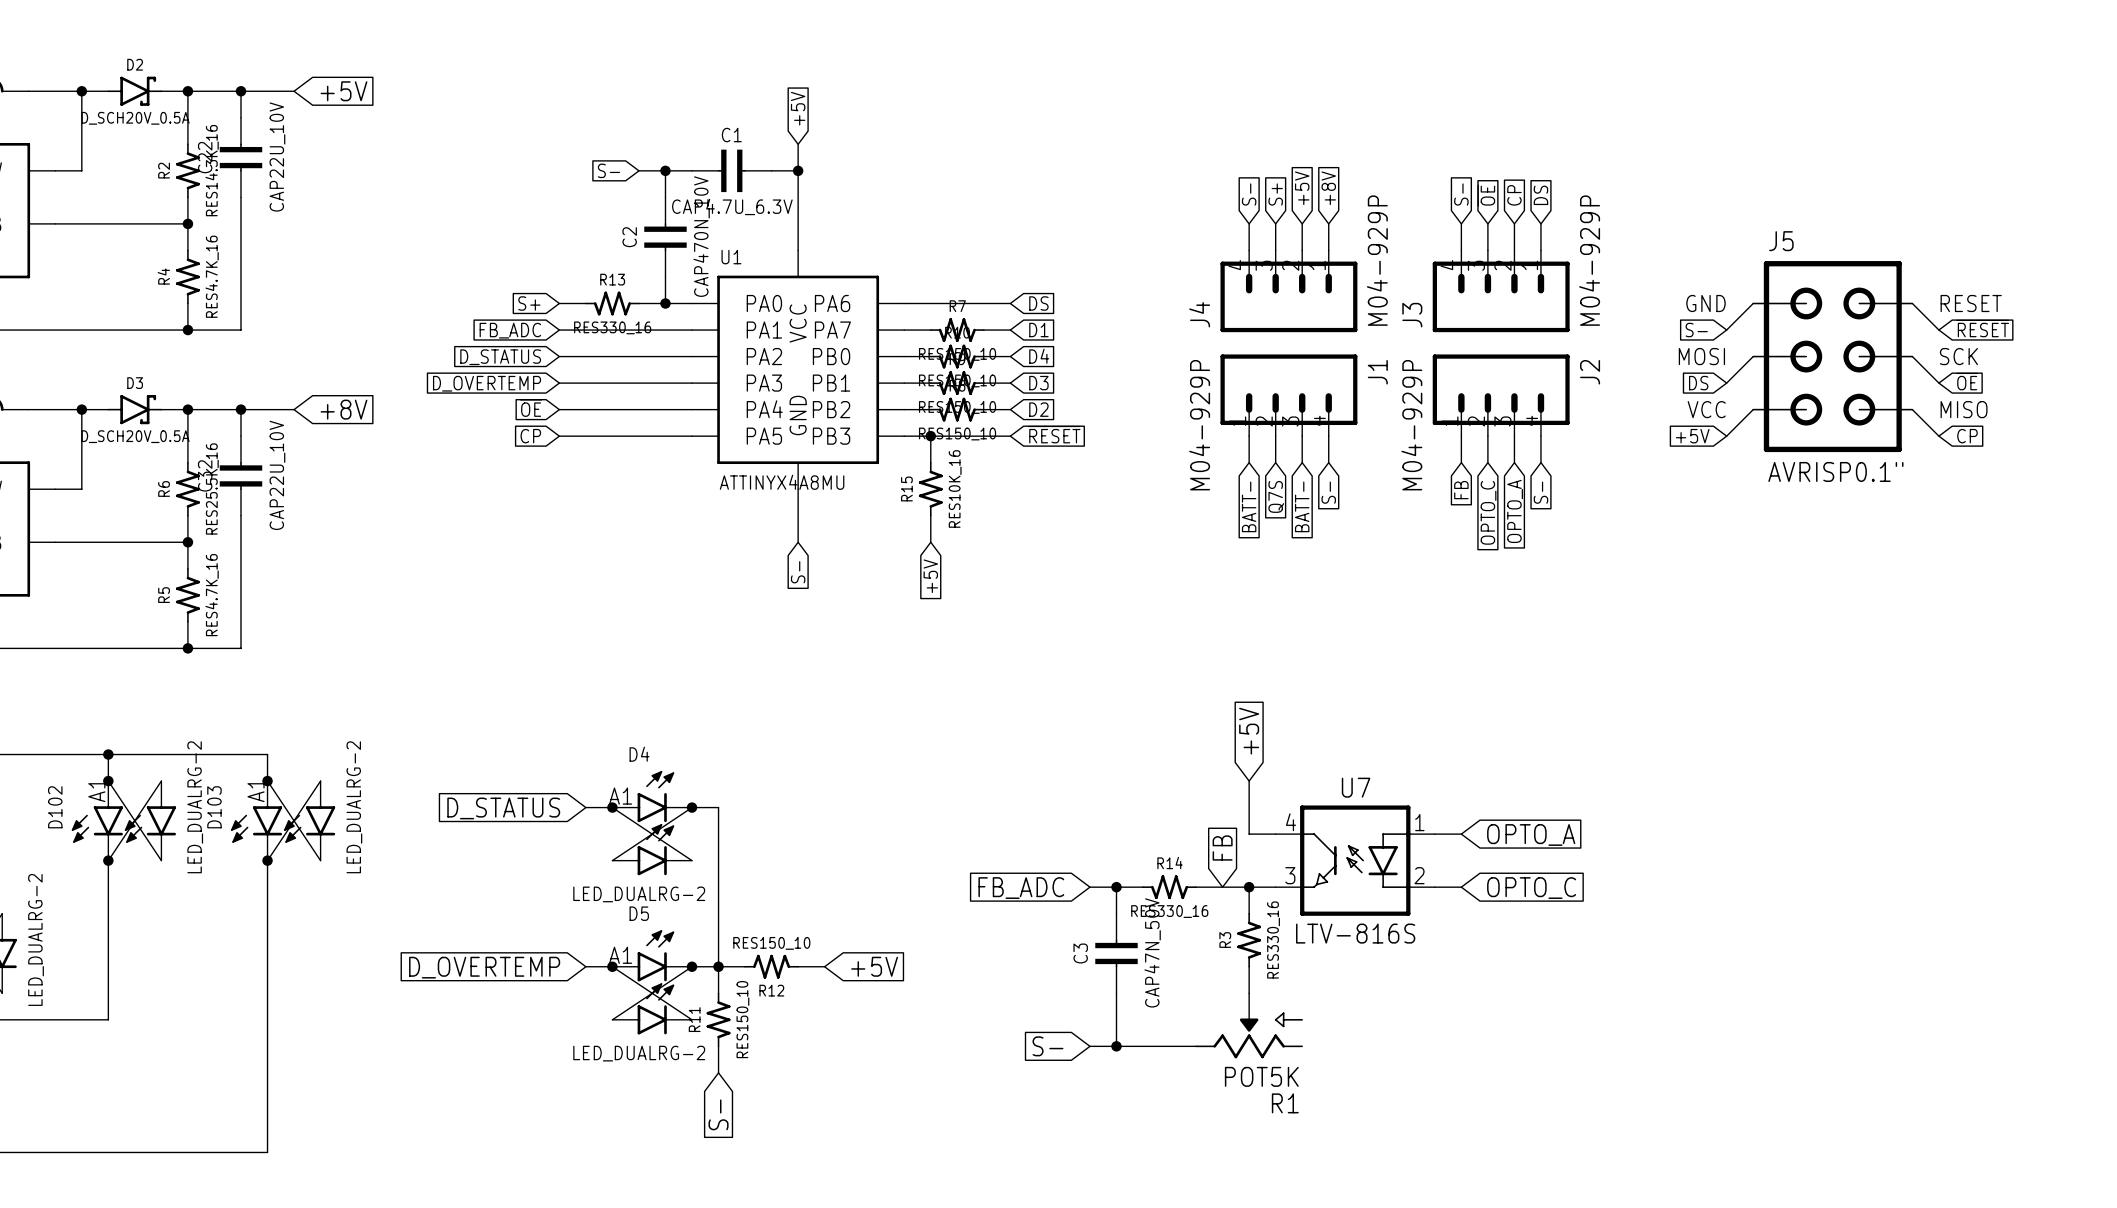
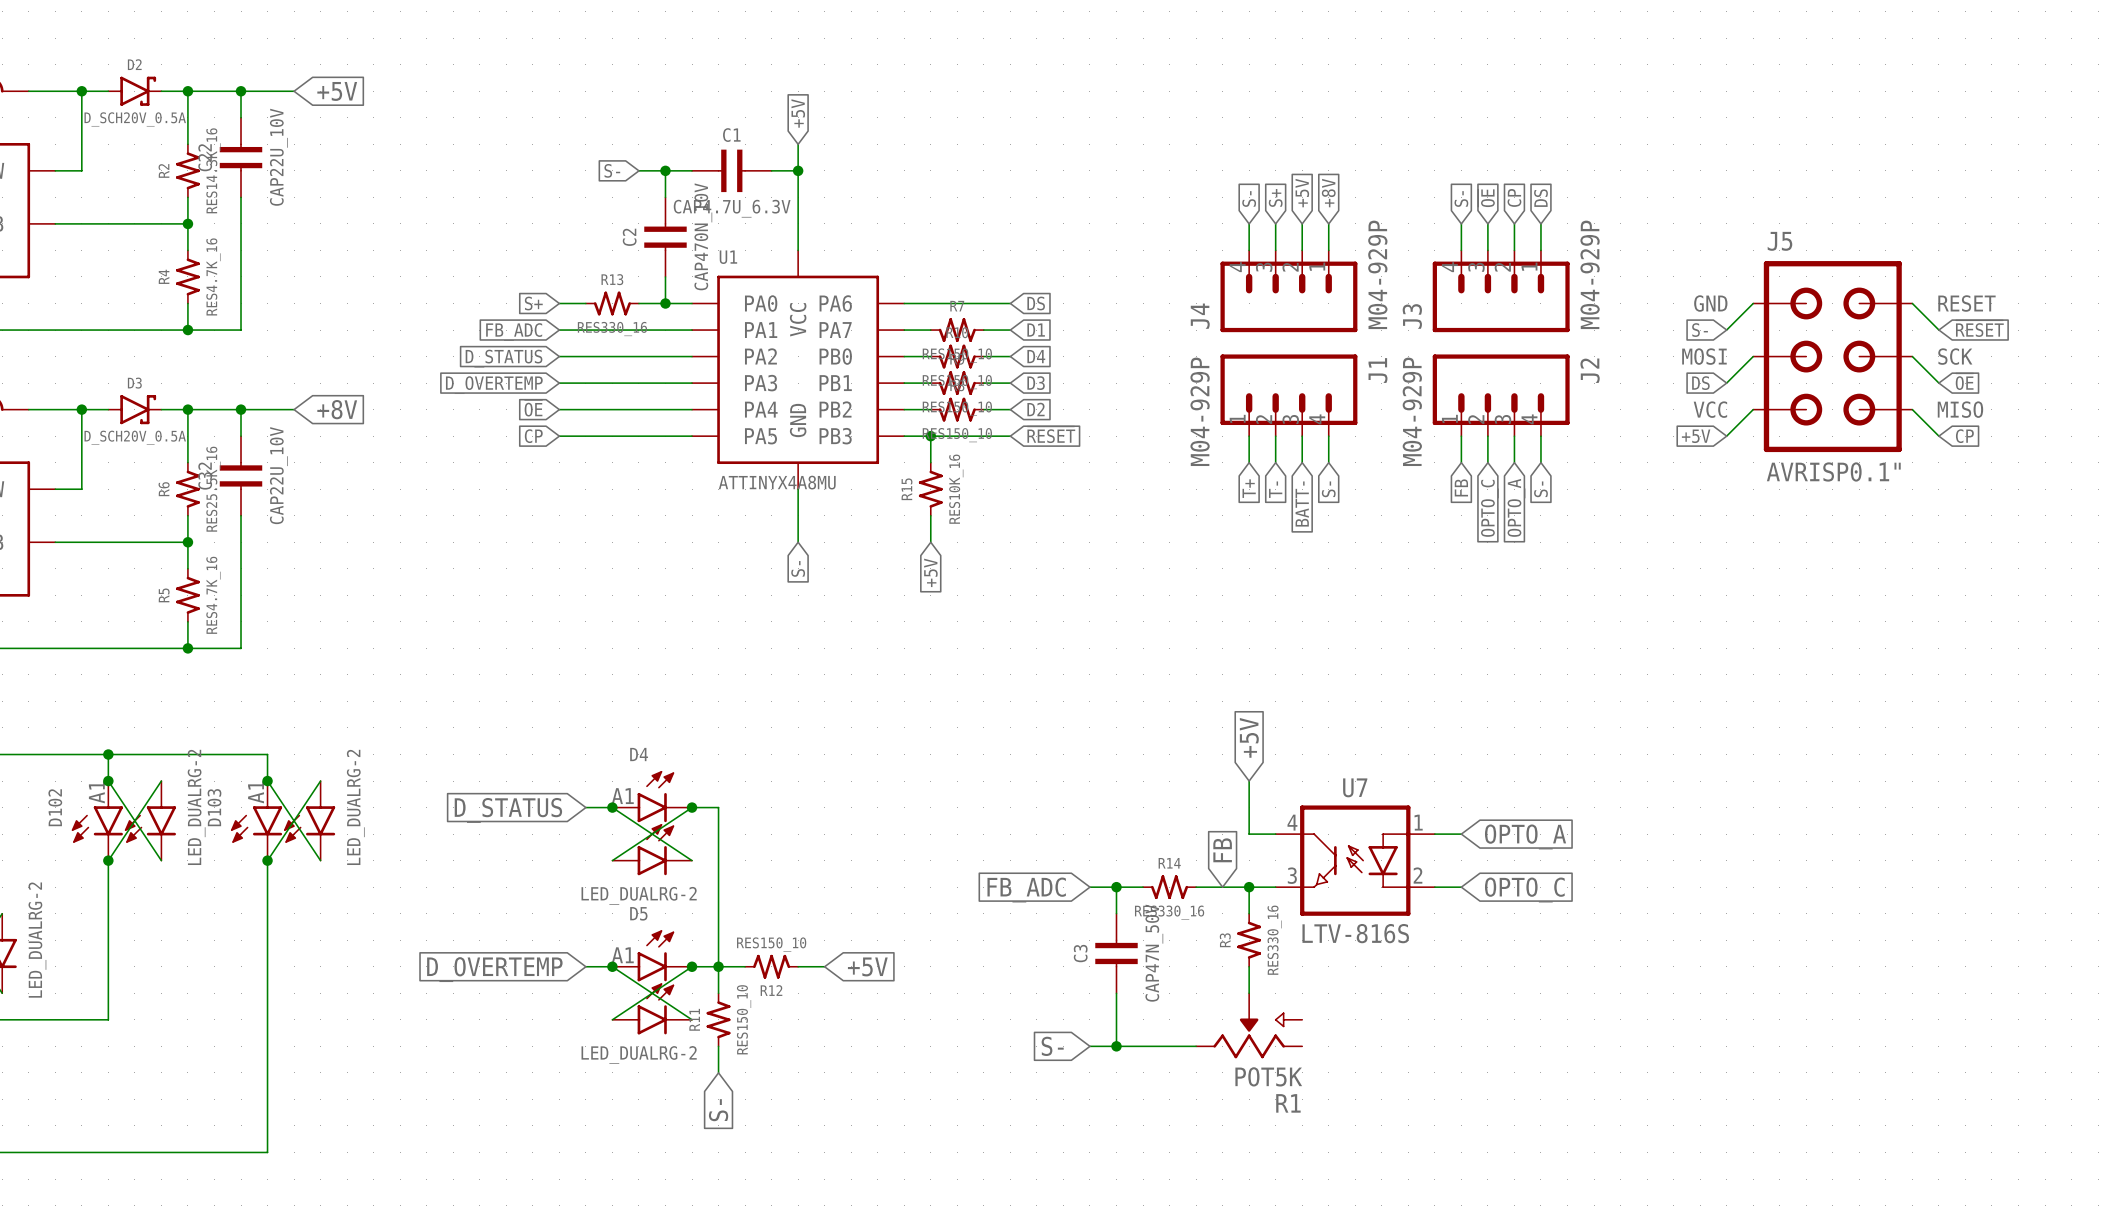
global label: Q7S (1276, 496) -> T- (1275, 489)
global label: BATT- (1249, 506) -> T+ (1249, 488)

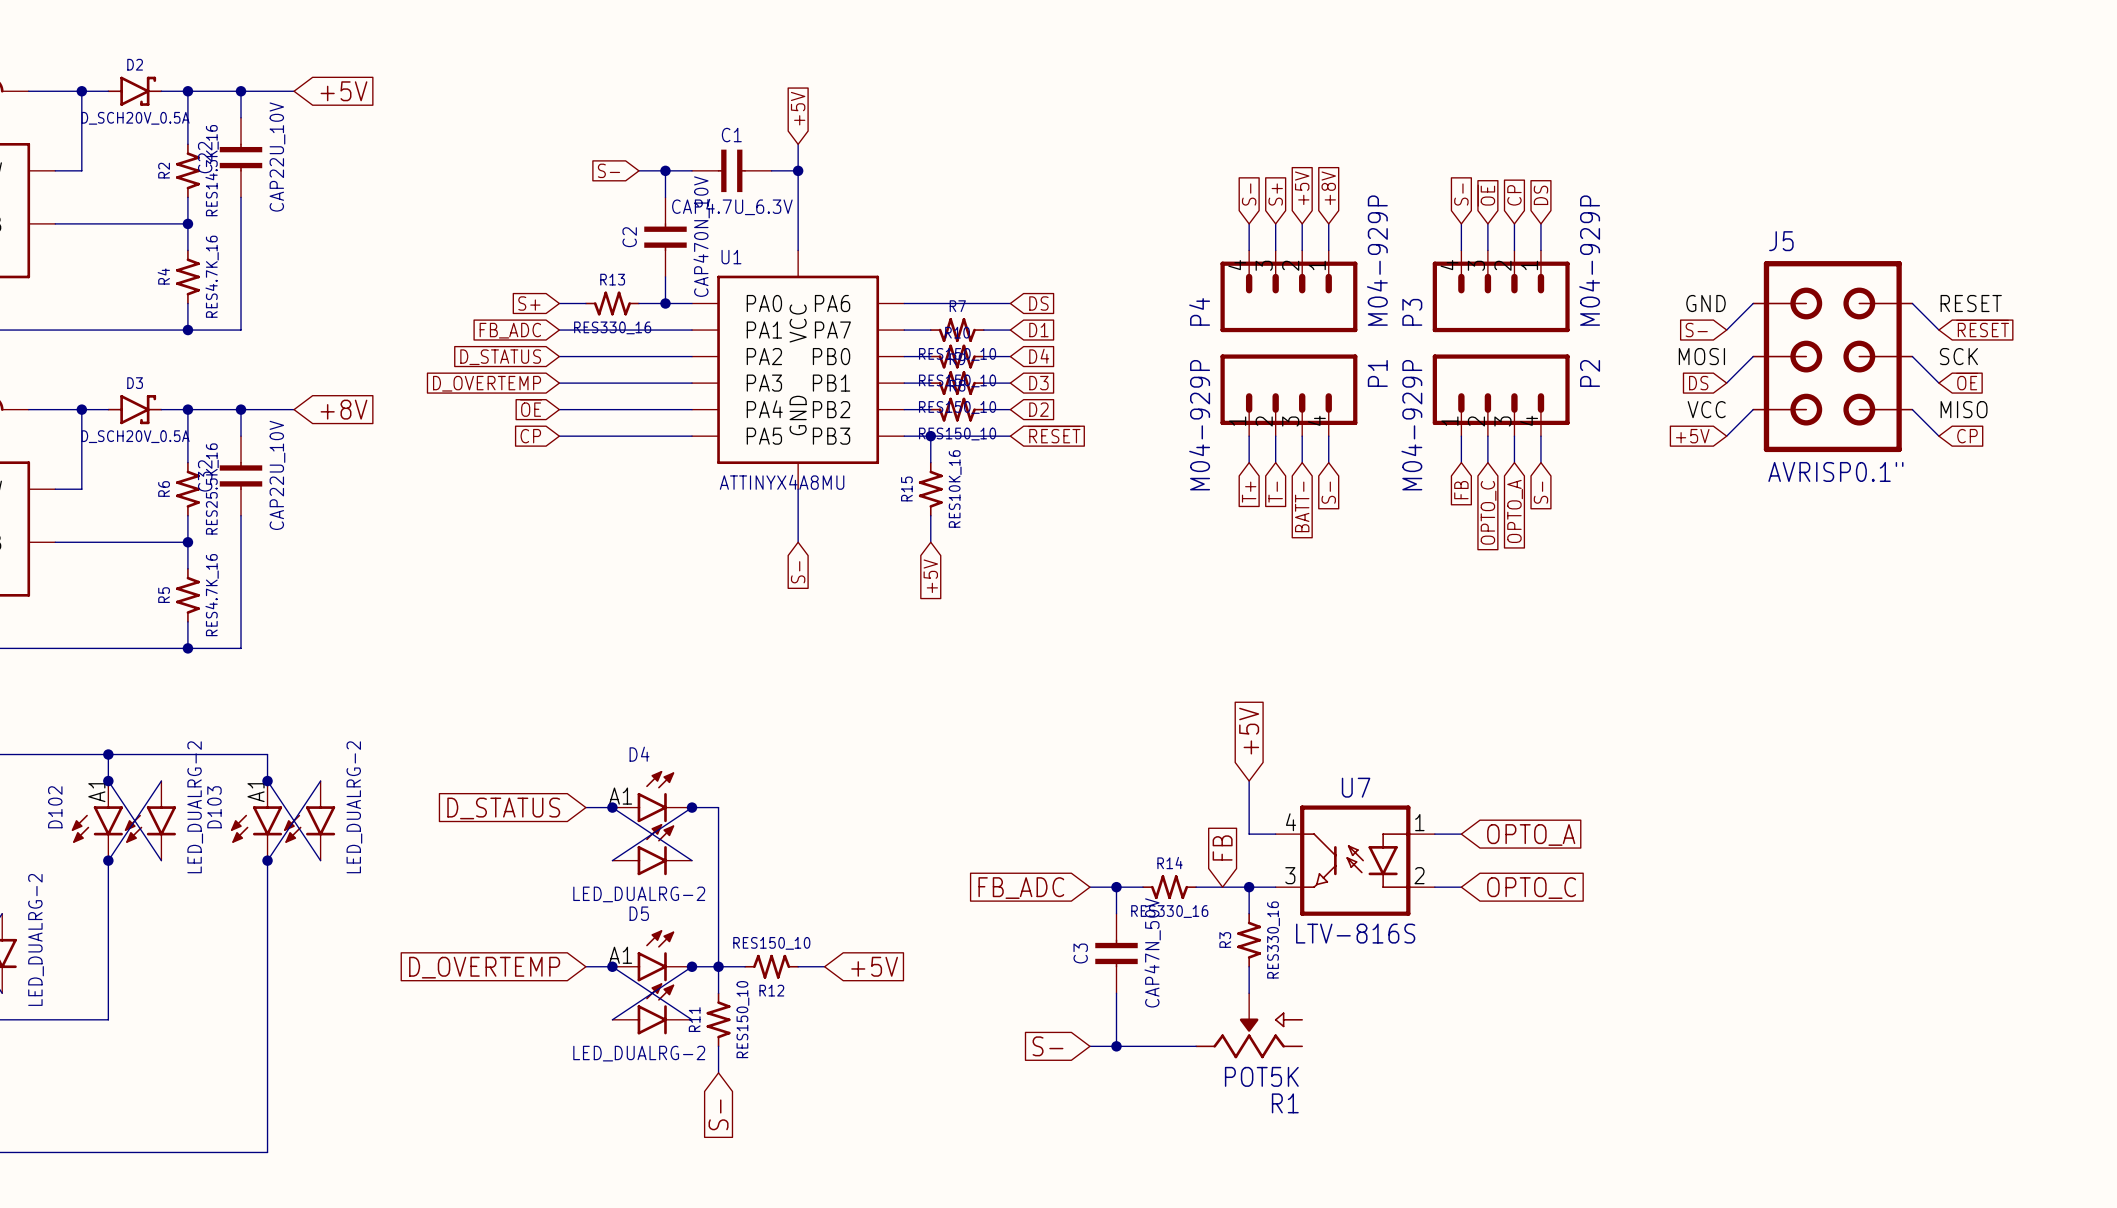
J4 name: J4 (1200, 316) -> P4 (1199, 311)
J3 name: J3 (1412, 316) -> P3 (1412, 312)
J1 name: J1 (1377, 370) -> P1 (1377, 373)
J2 name: J2 (1590, 370) -> P2 (1590, 373)

